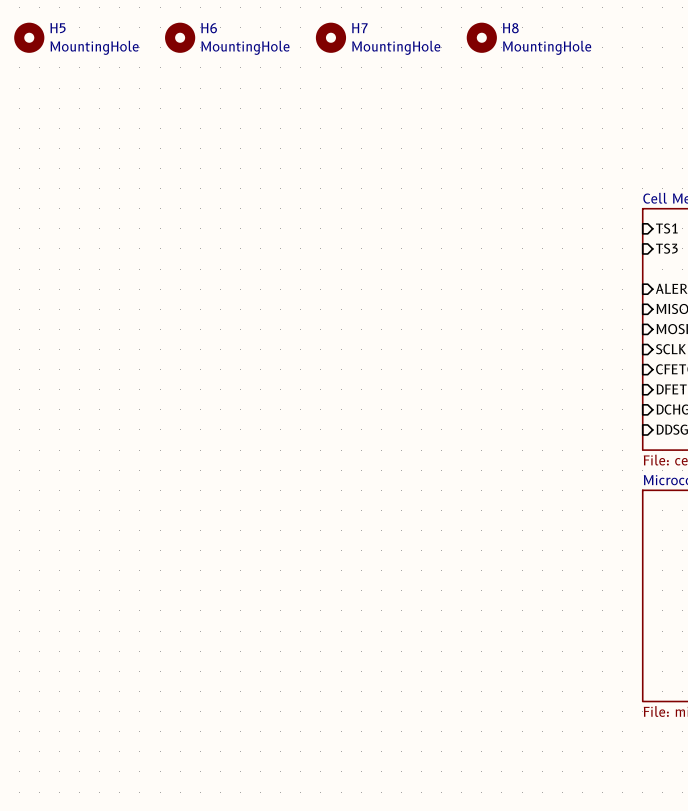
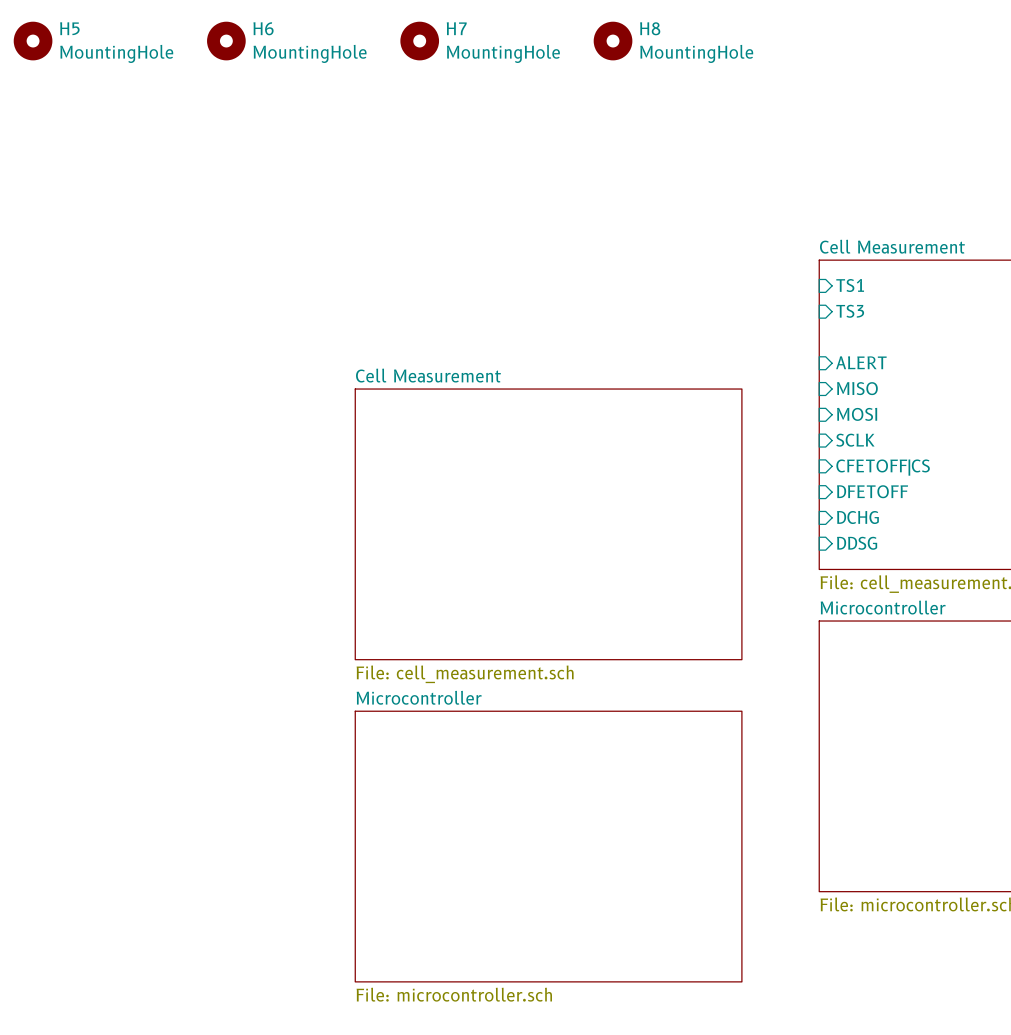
sheet Cell Measurement: none -> File: cell_measurement.sch (548, 524)
sheet Microcontroller: none -> File: microcontroller.sch (548, 846)

